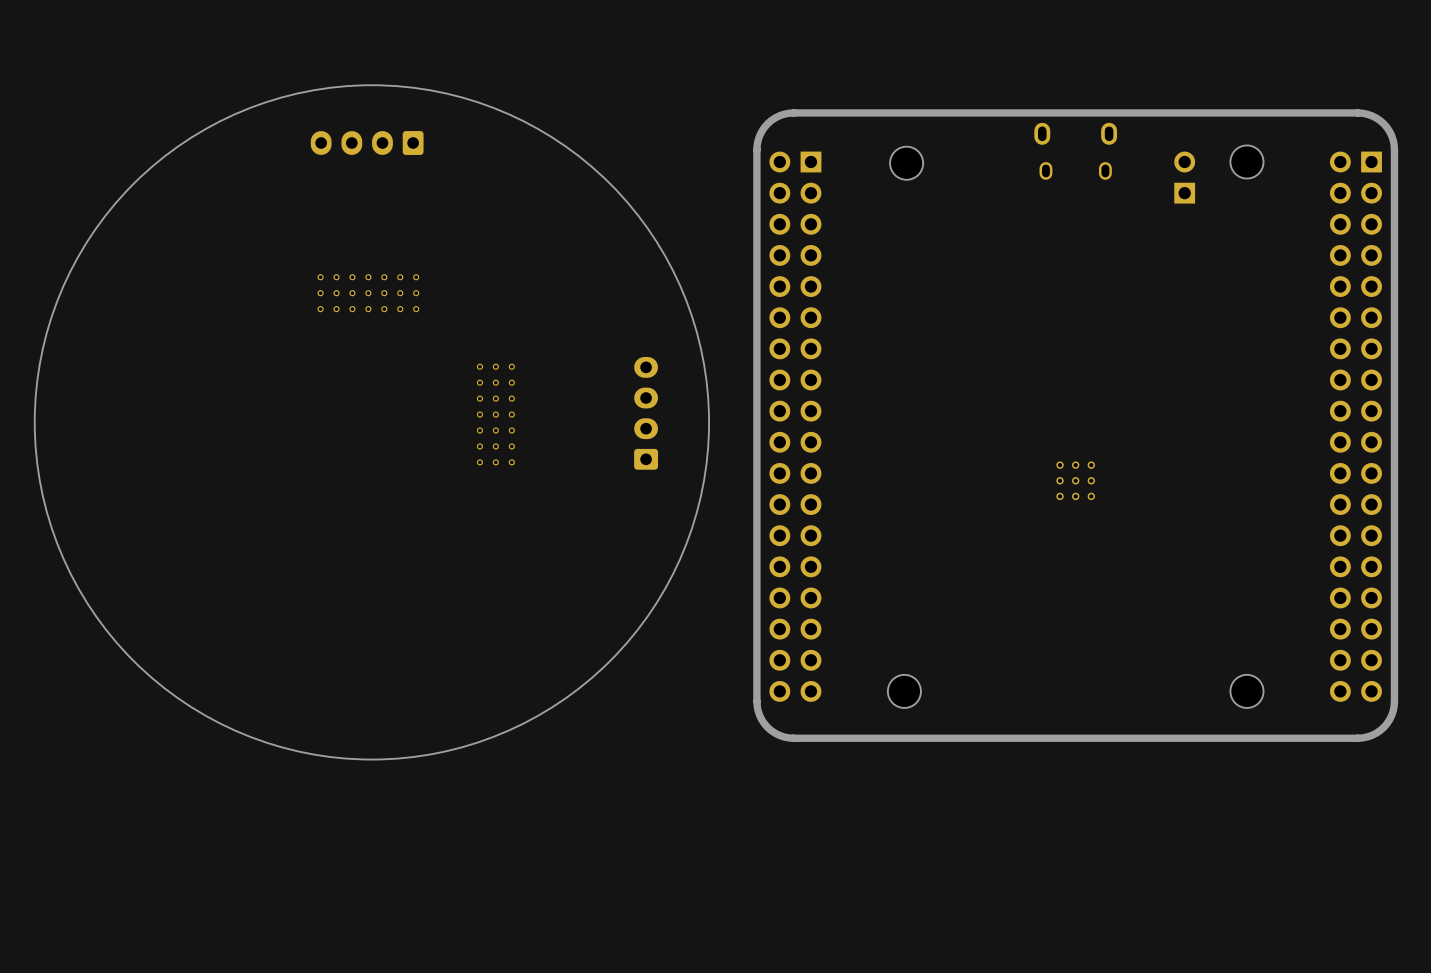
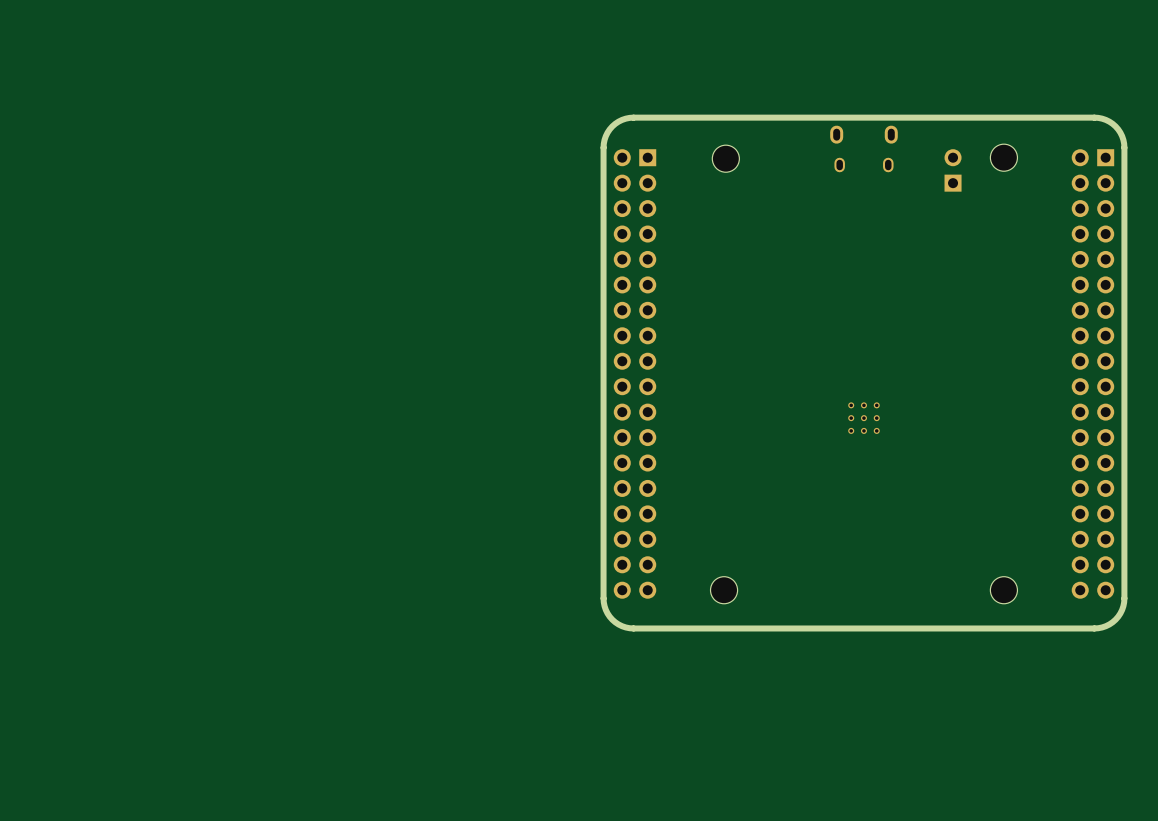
round board edge: [34, 84, 710, 760] -> none
part: (367, 143) -> none
part: (368, 293) -> none
part: (646, 413) -> none
part: (495, 414) -> none

